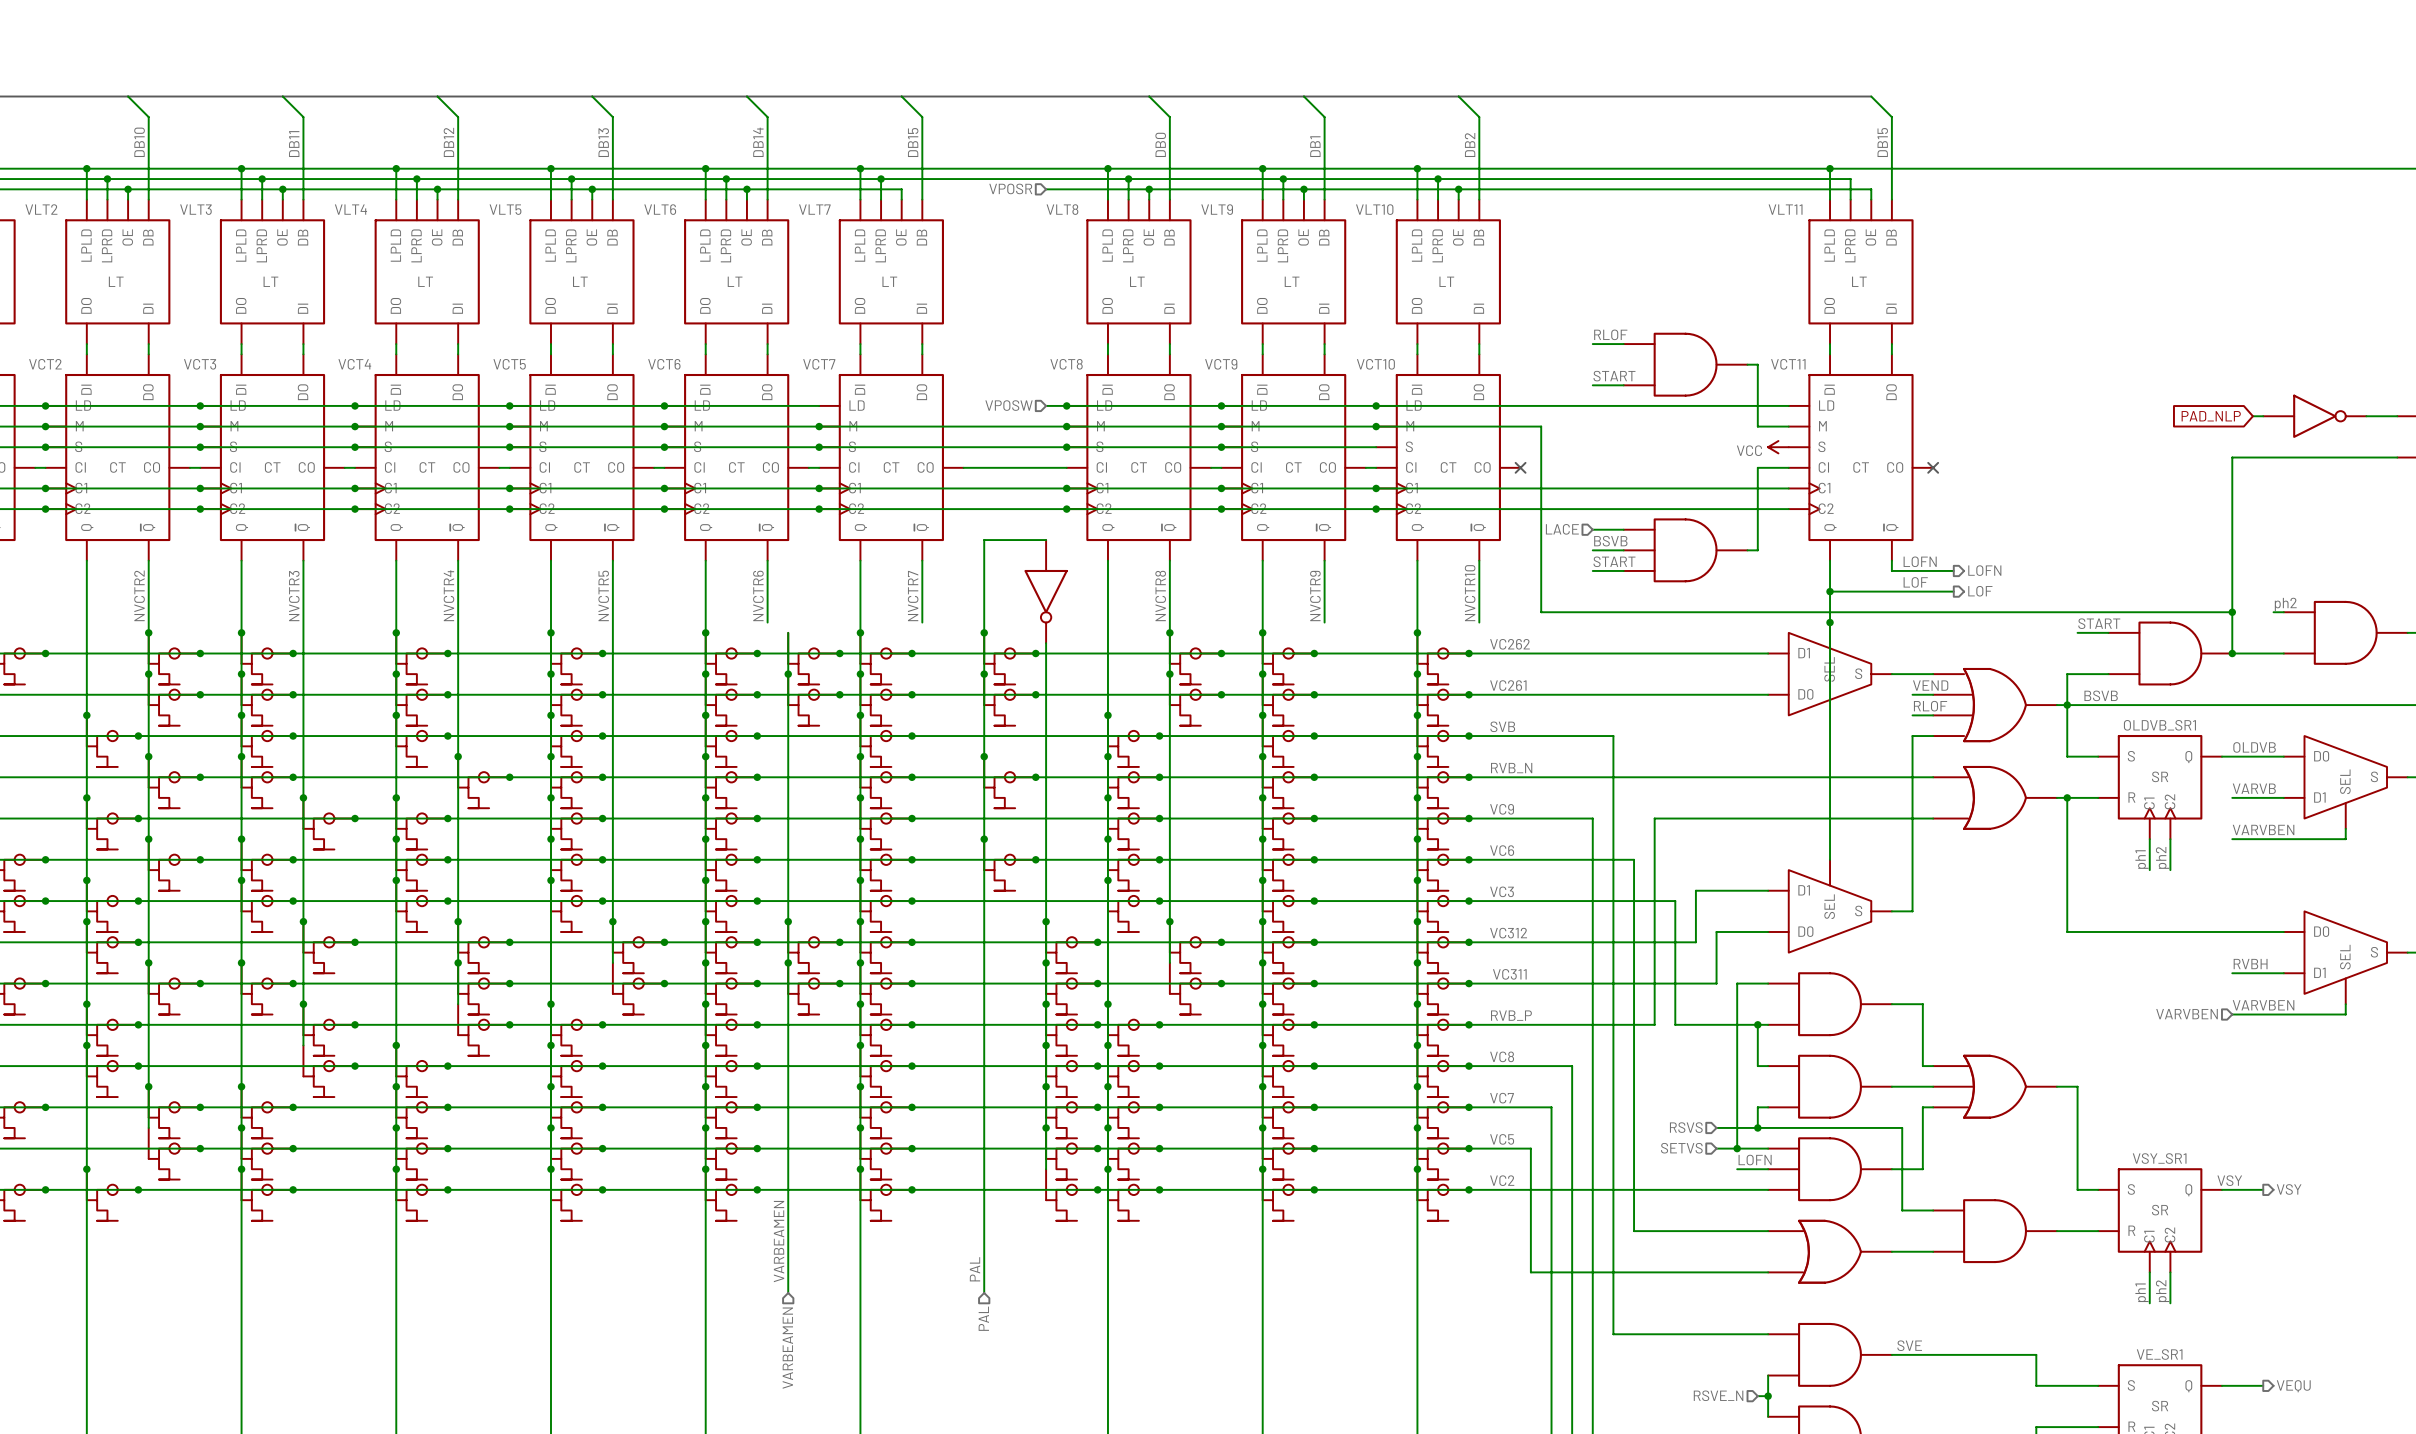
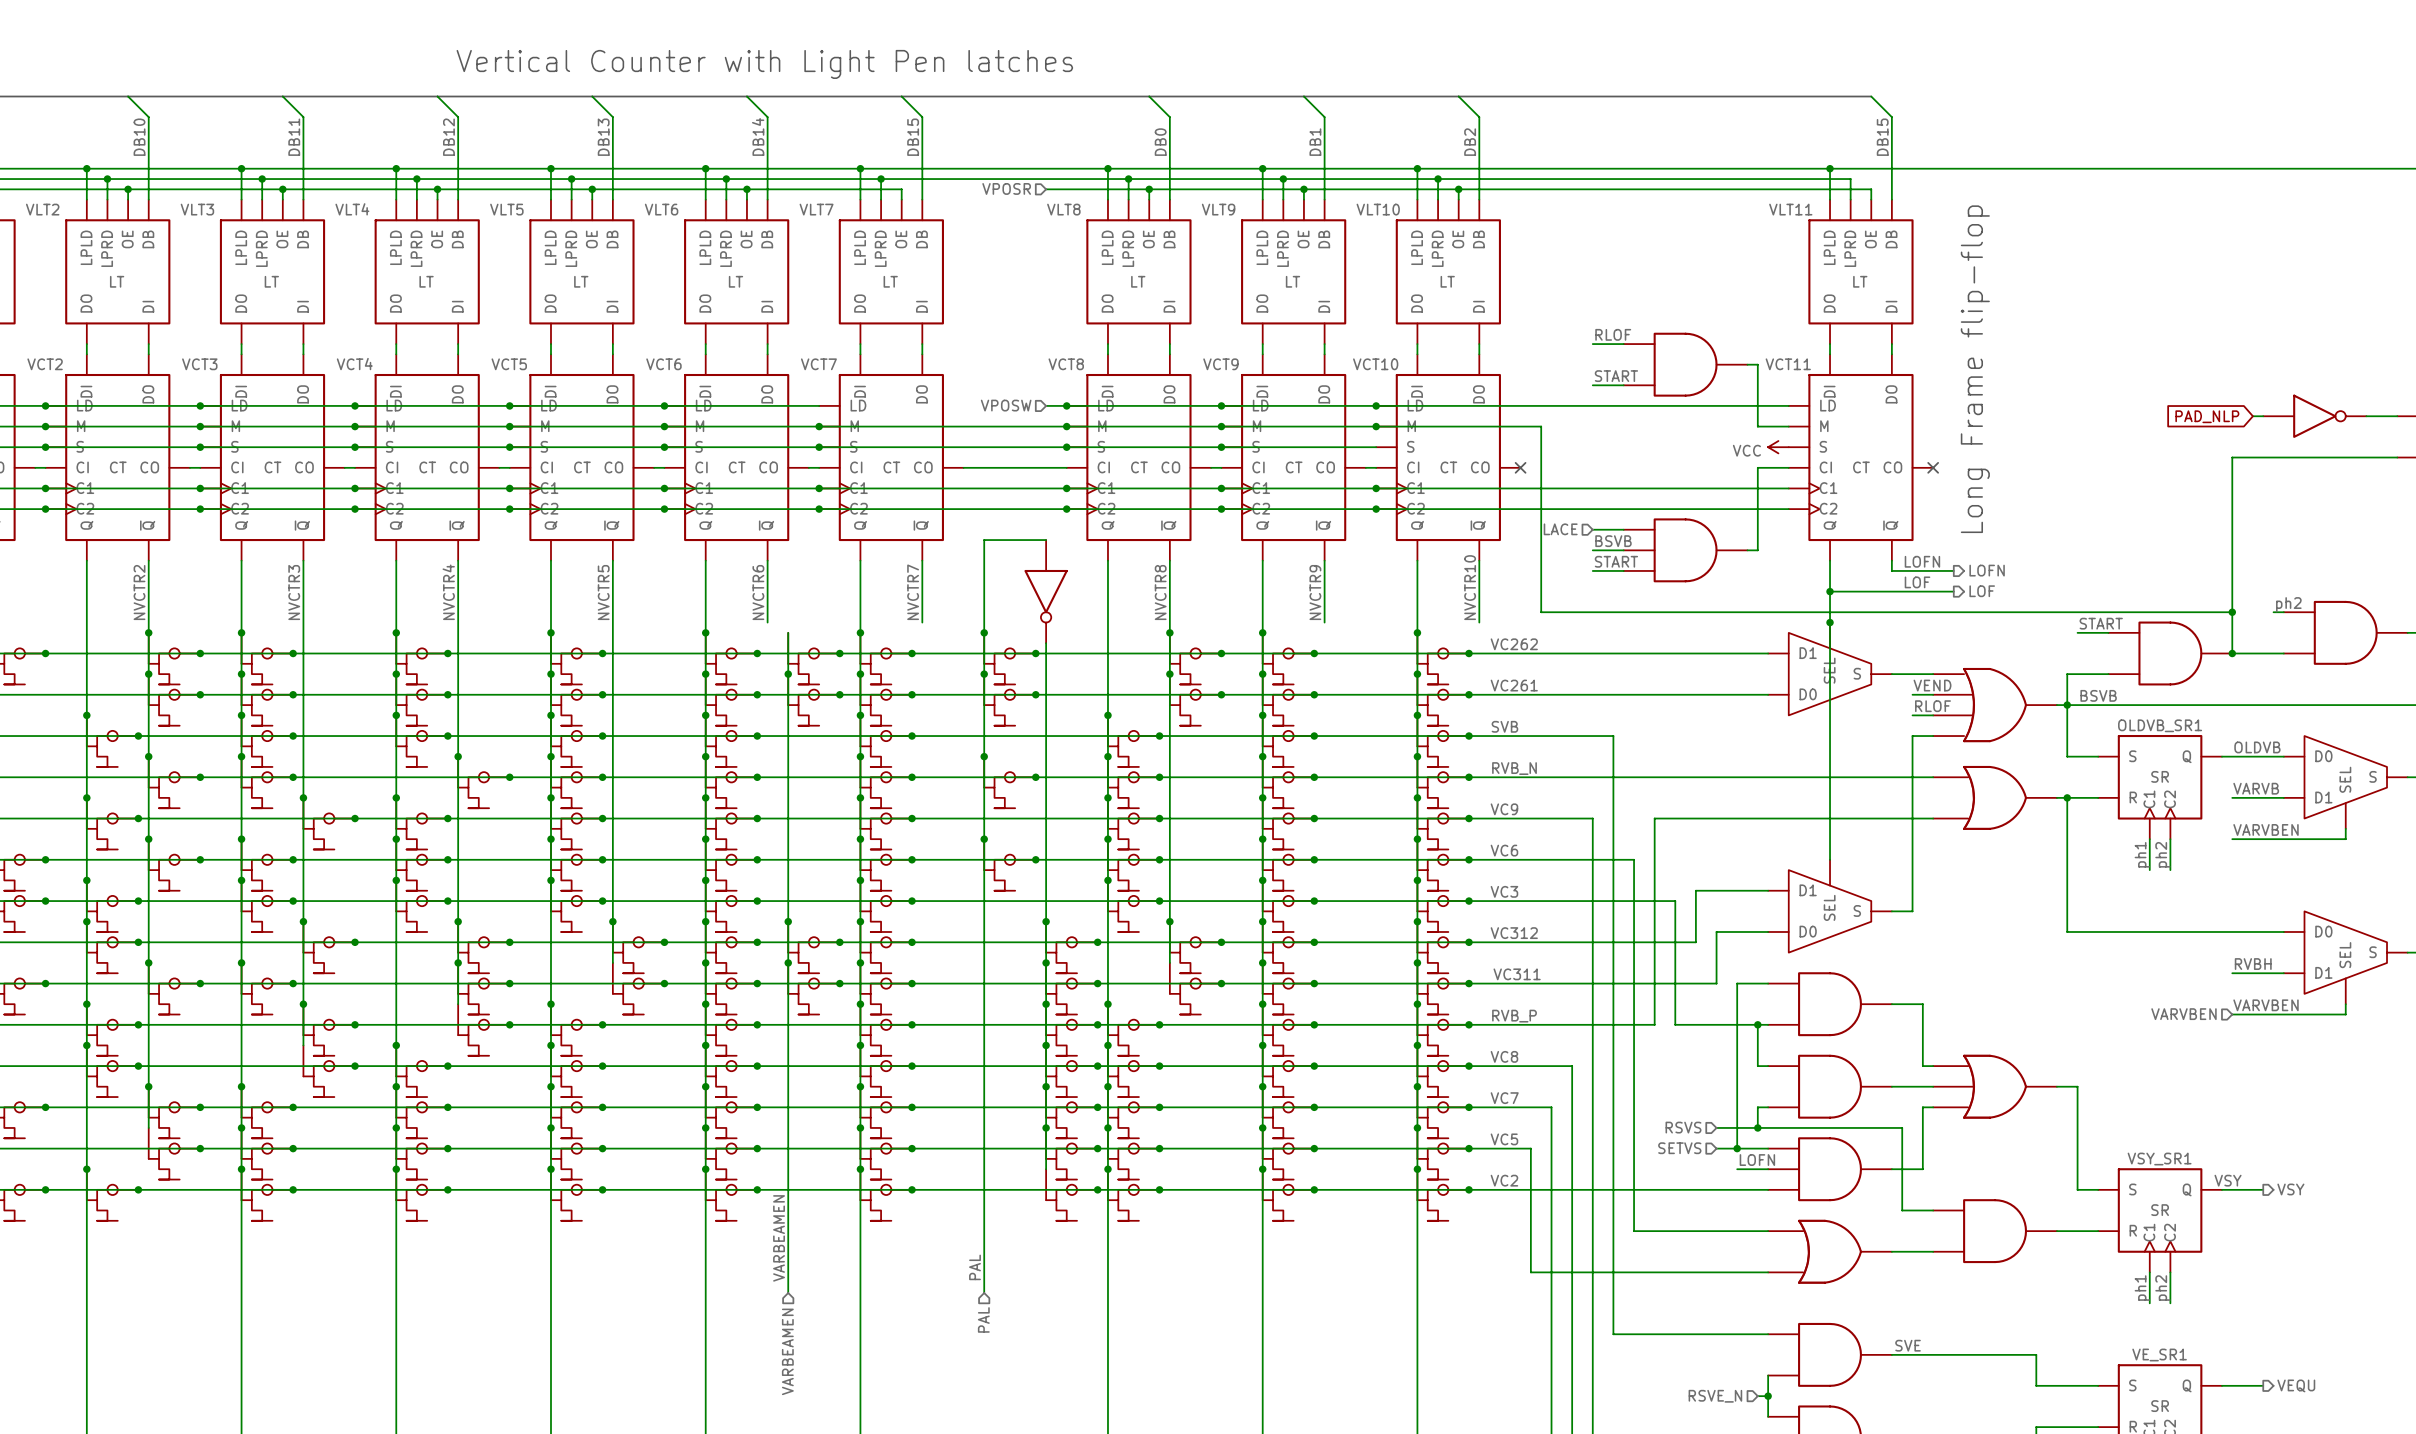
text: none -> Vertical Counter with Light Pen latches (764, 64)
text: none -> Long Frame flip-flop (1975, 369)

